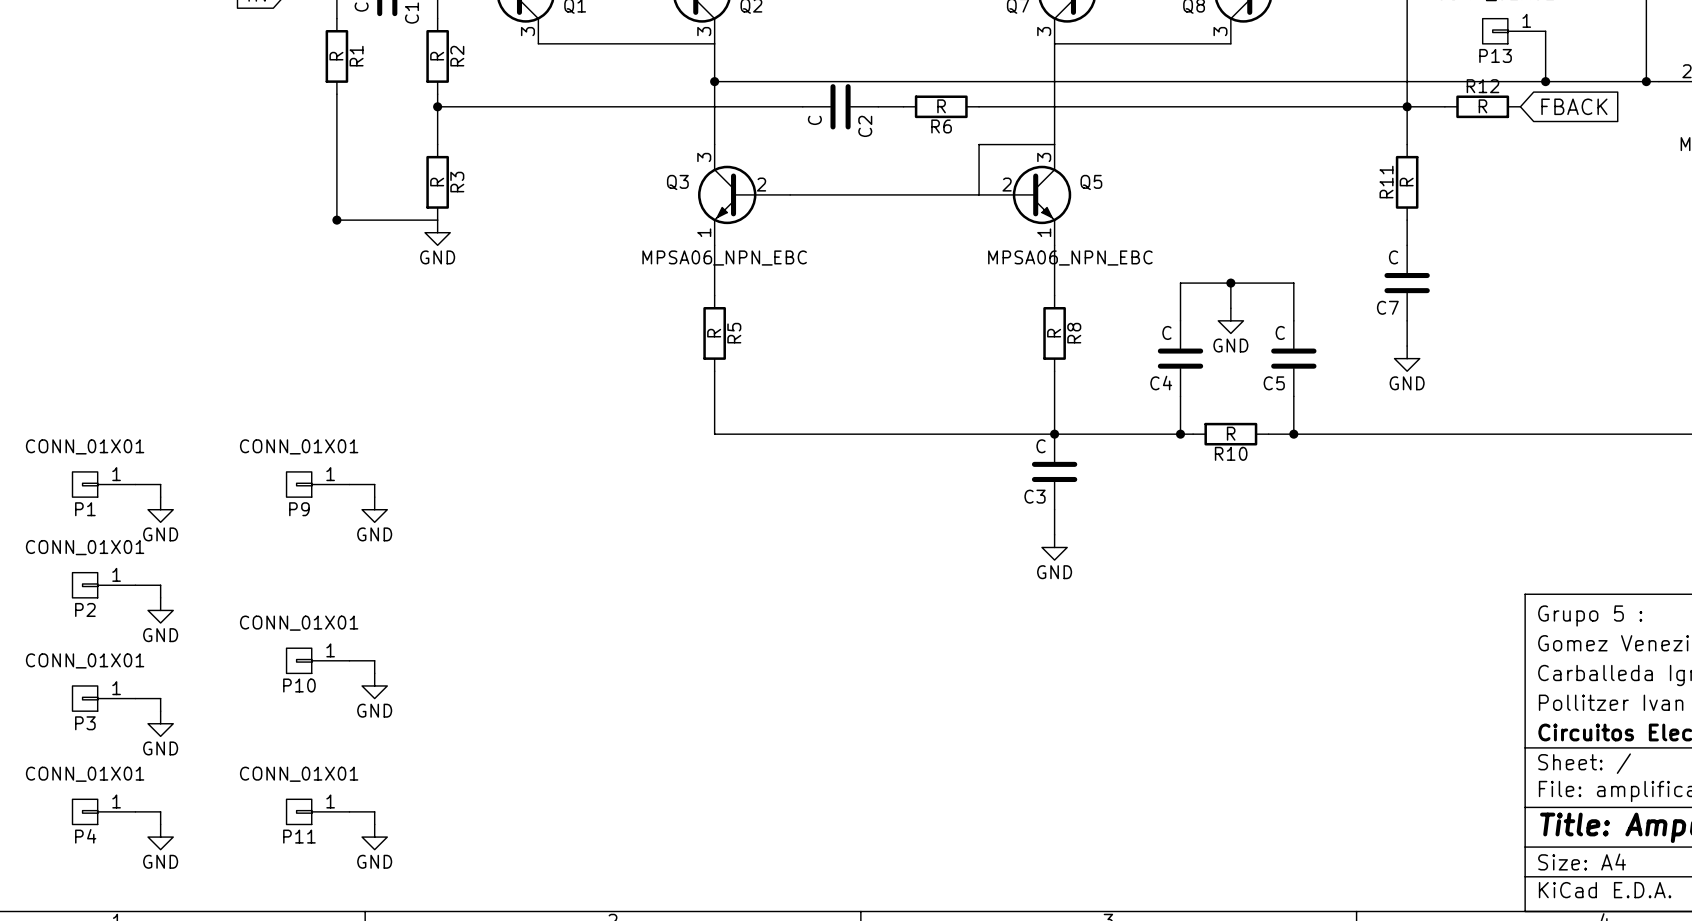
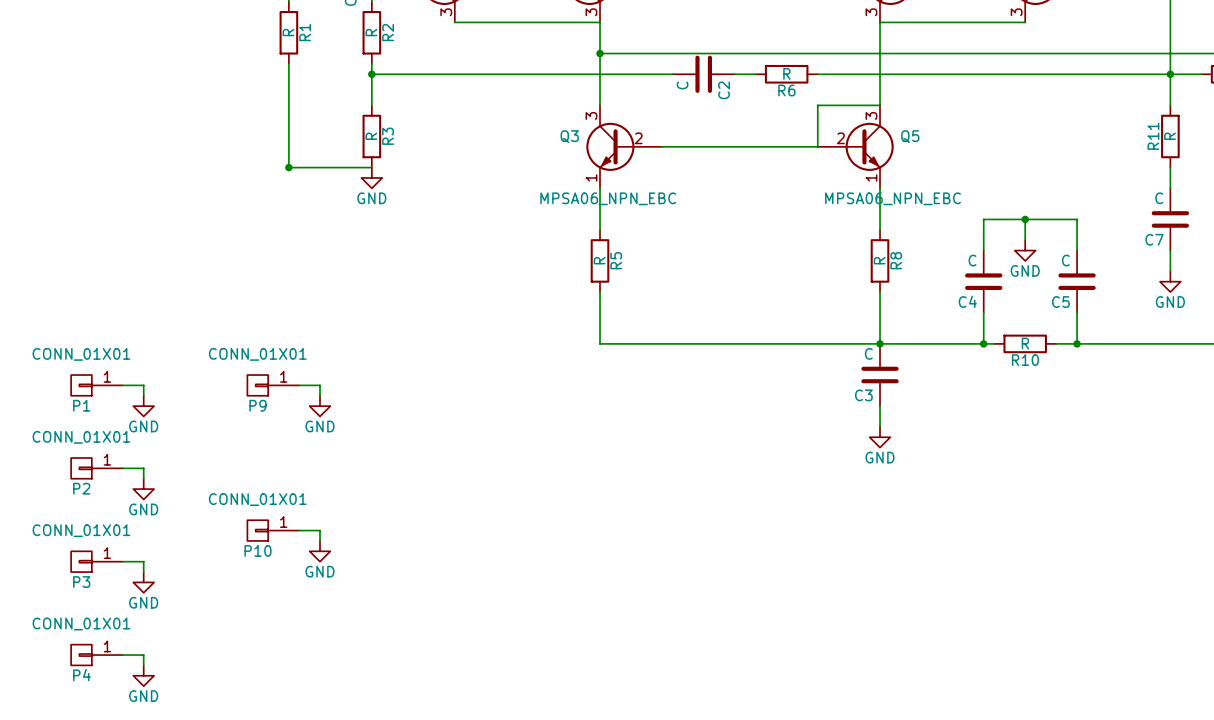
P11: CONN_01X01 (318, 811) -> none
wire: (349, 811) (374, 811) (374, 824) -> none
power symbol: GND (374, 837) -> none

